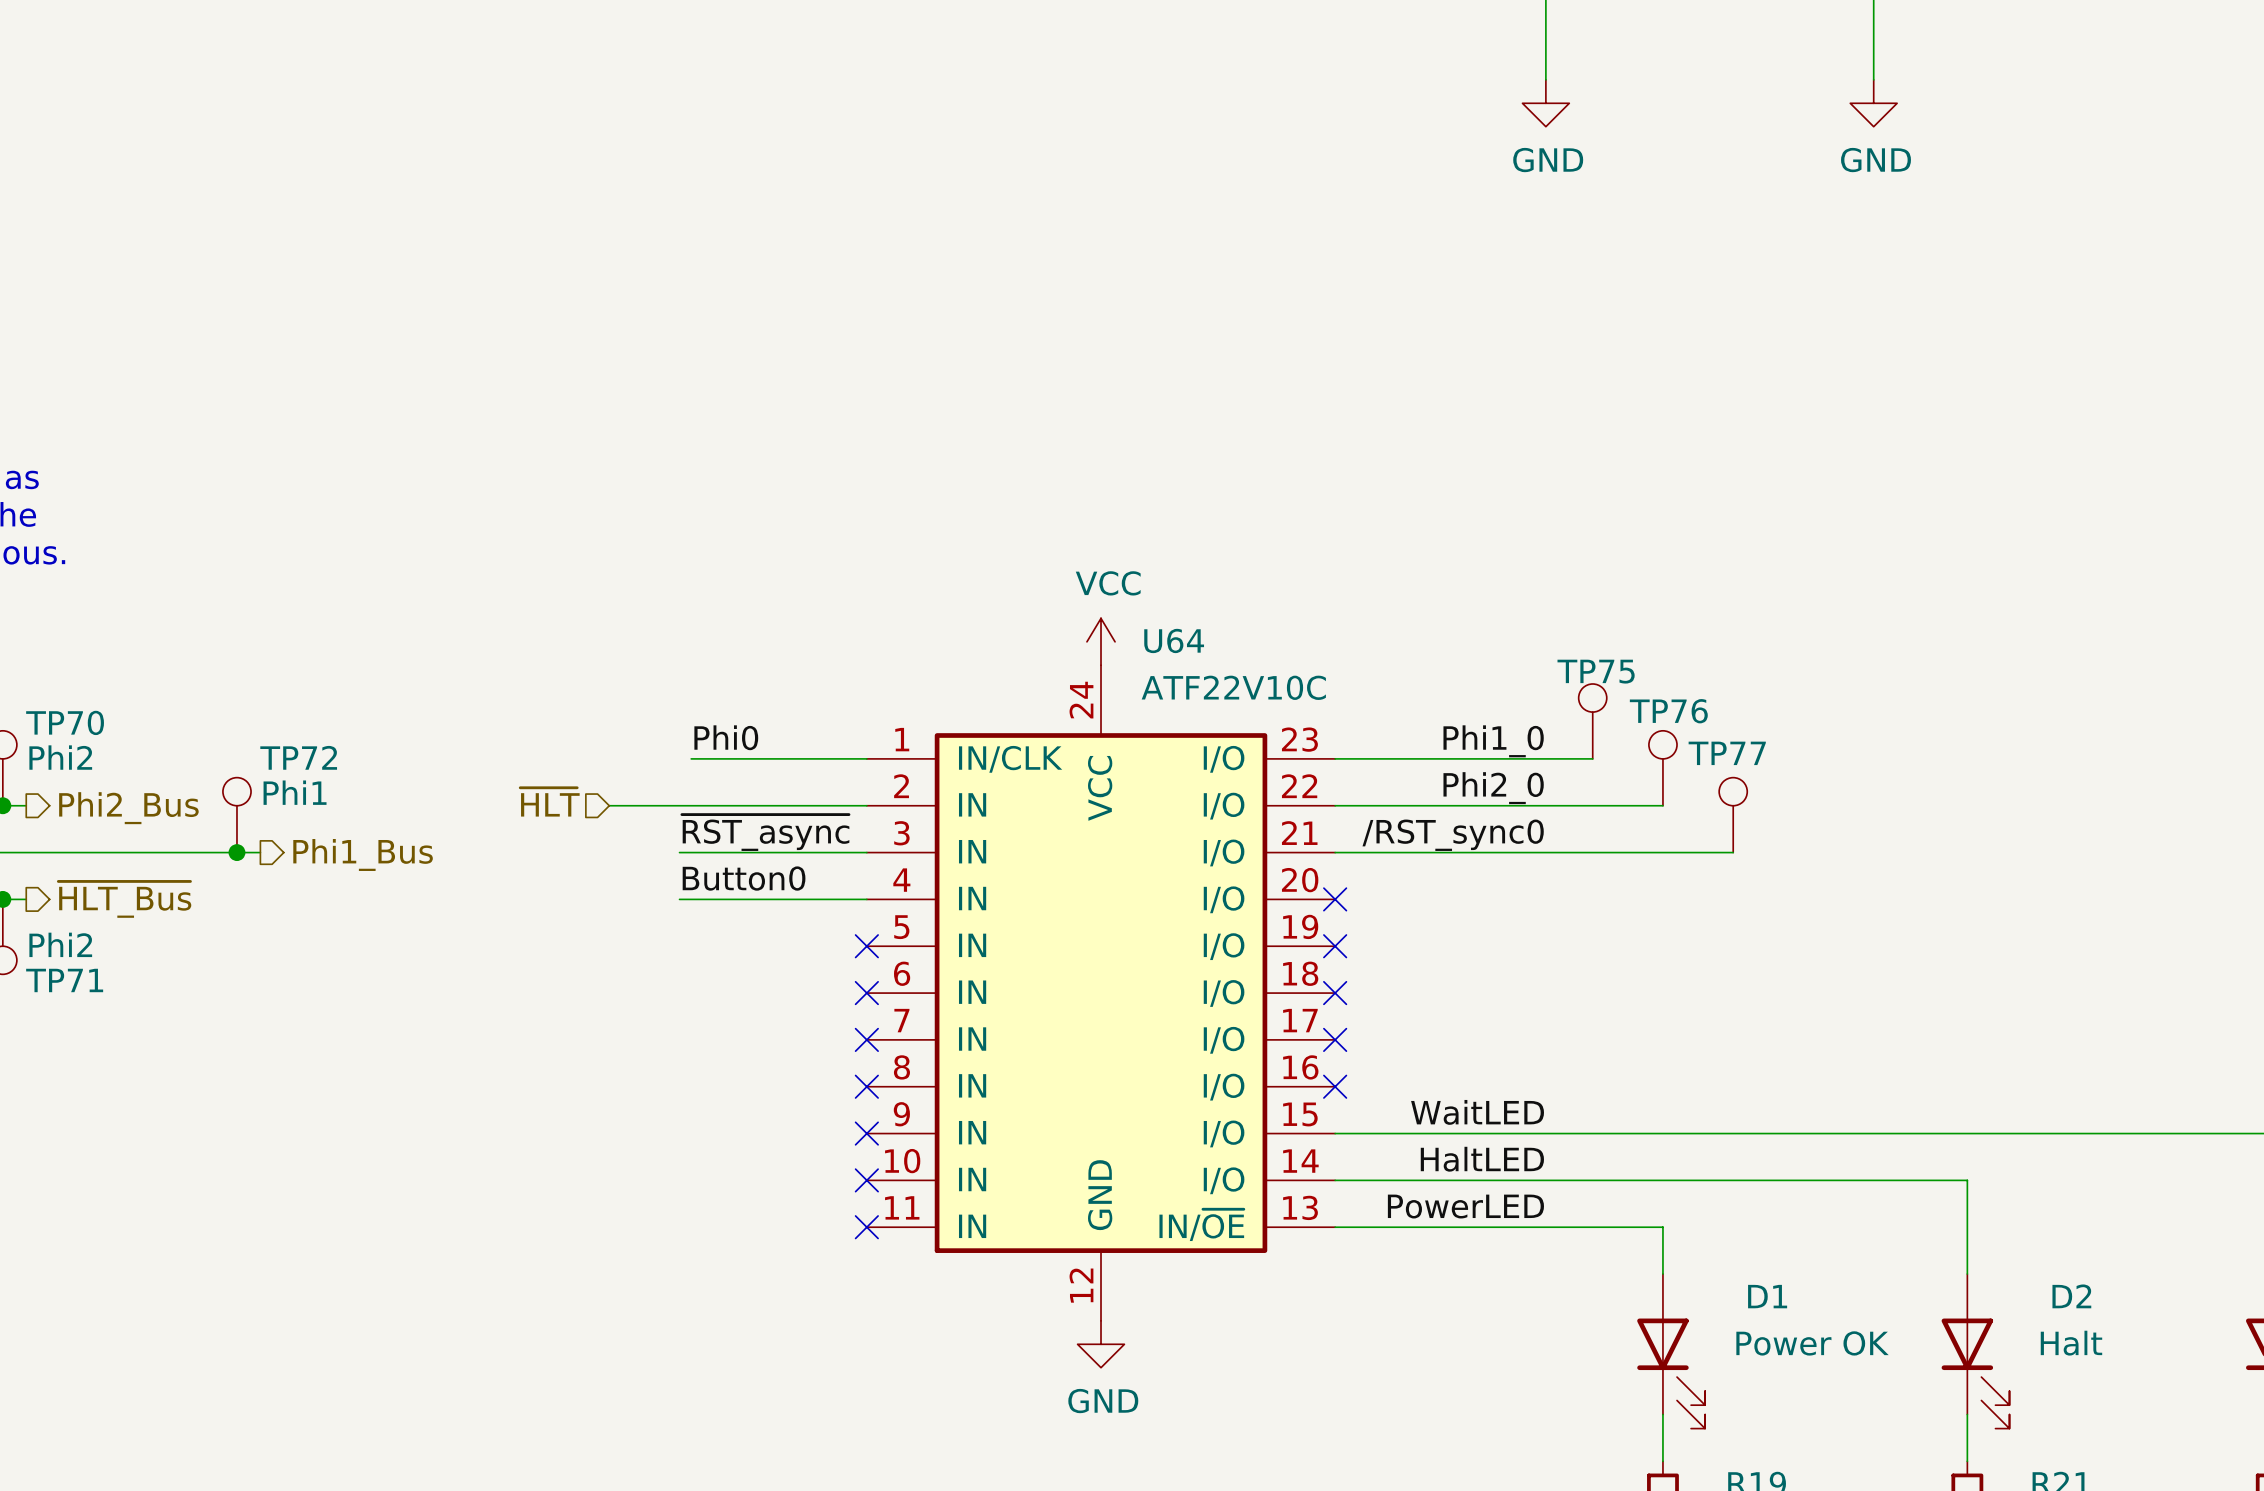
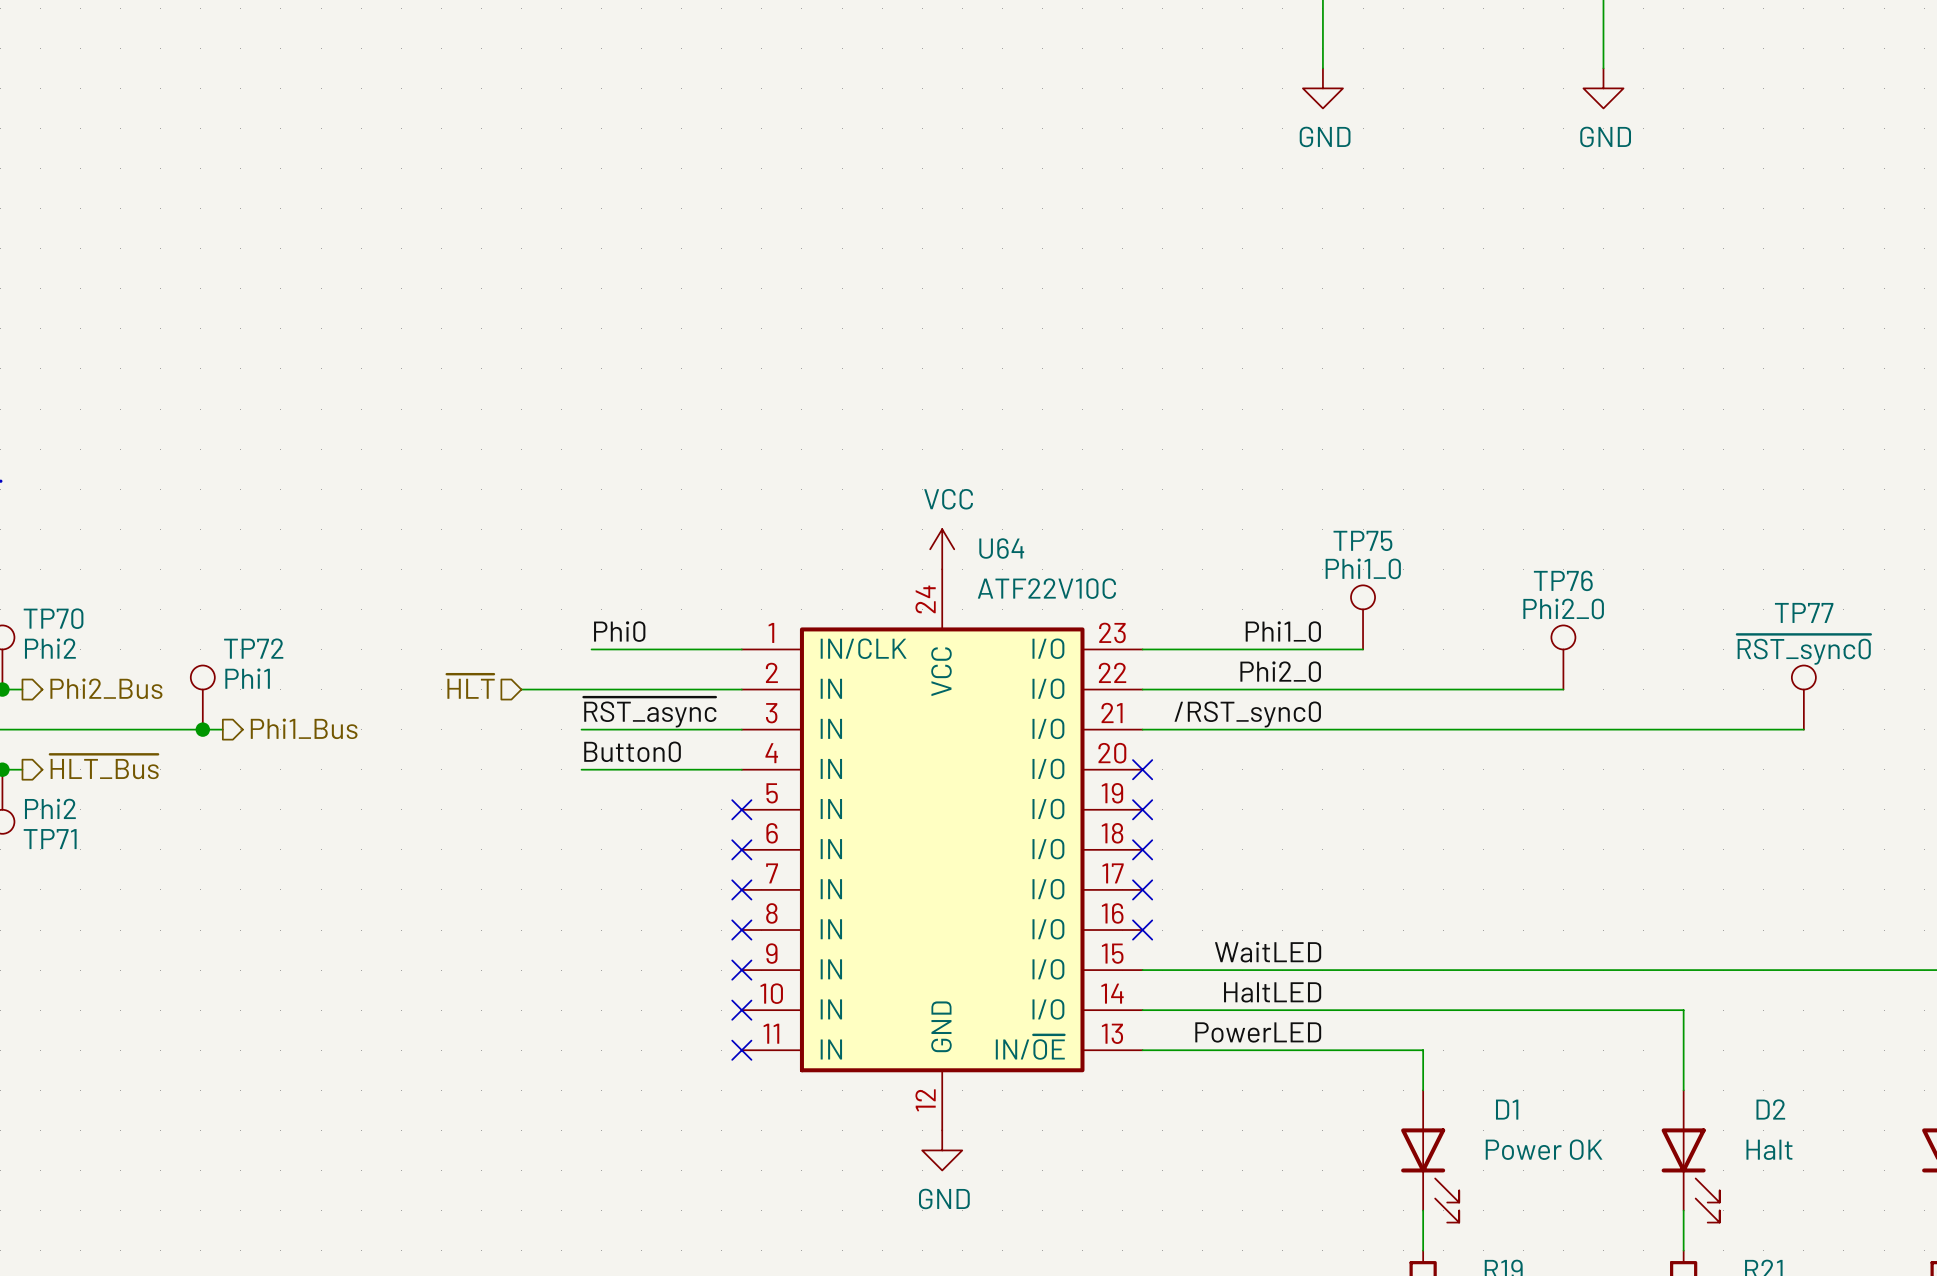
TP75 value: none -> Phi1_0 (1363, 568)
TP75 name position: TP75 (1596, 671) -> TP75 (1362, 540)
TP76 name position: TP76 (1668, 711) -> TP76 (1563, 580)
TP76 value: none -> Phi2_0 (1563, 608)
TP77 name position: TP77 (1727, 753) -> TP77 (1804, 612)
TP77 value: none -> ~{RST_sync0} (1803, 649)
TP76 position: (1662, 768) -> (1563, 657)
wire: none -> (1423, 689) (1563, 689)
TP77 position: (1733, 815) -> (1803, 697)
wire: none -> (1483, 729) (1803, 729)

